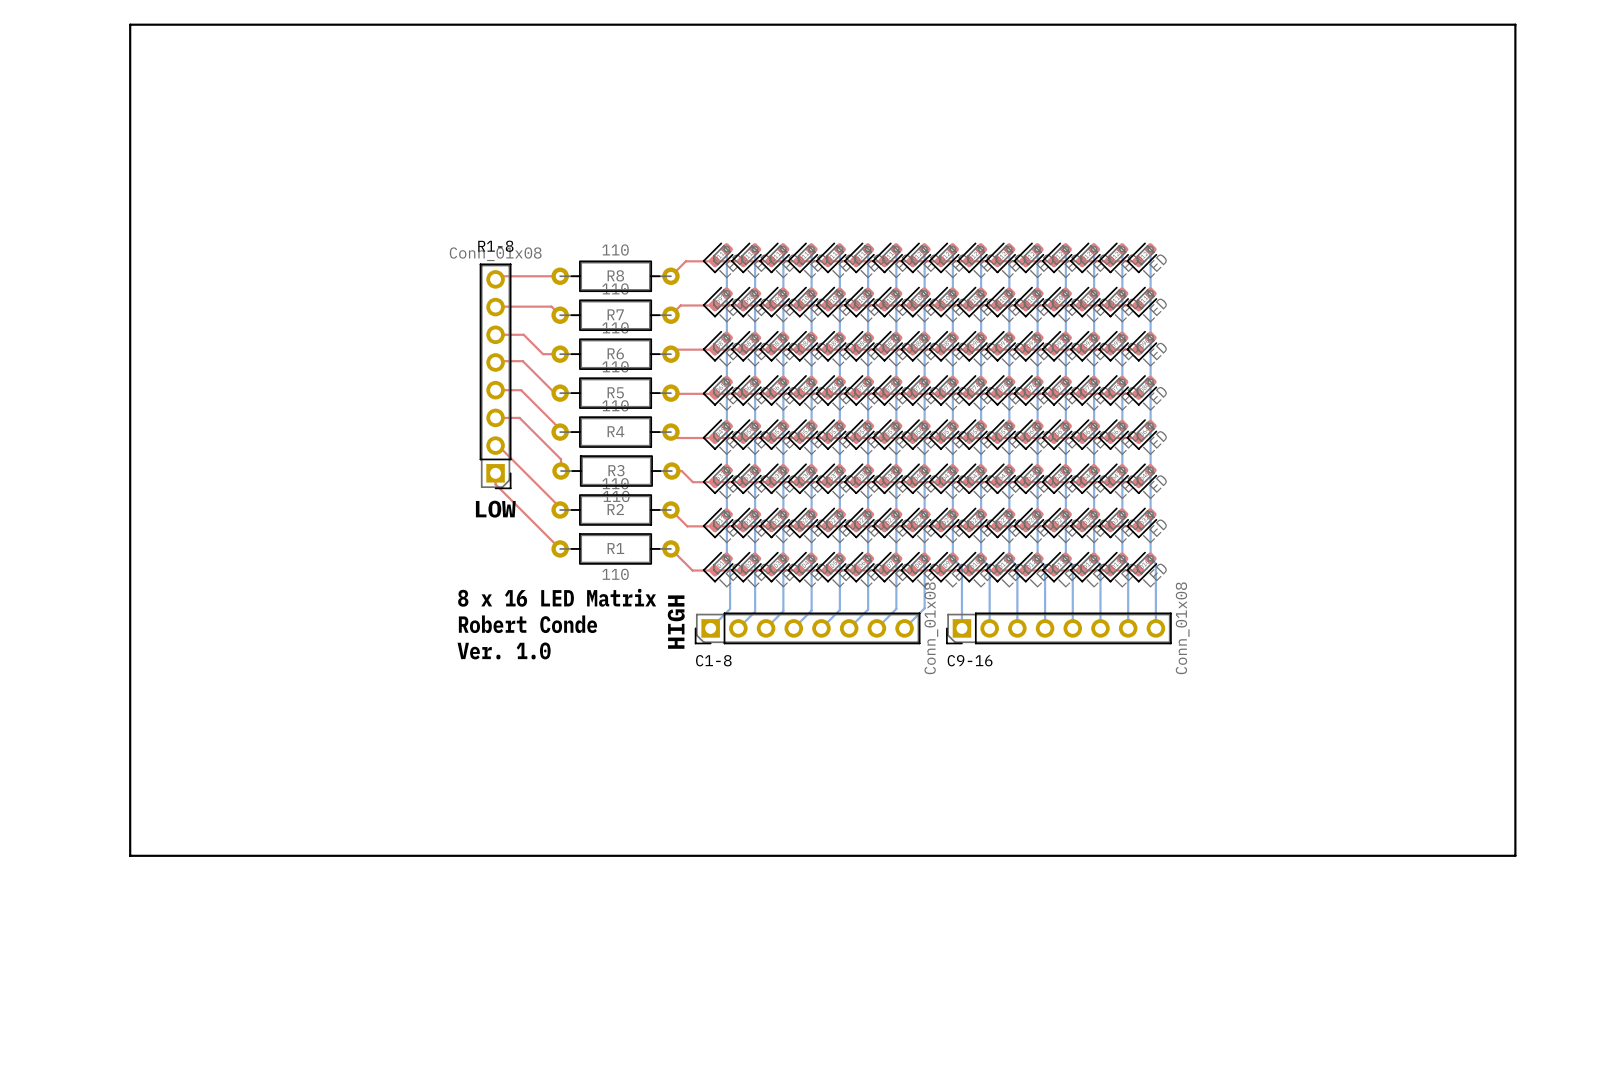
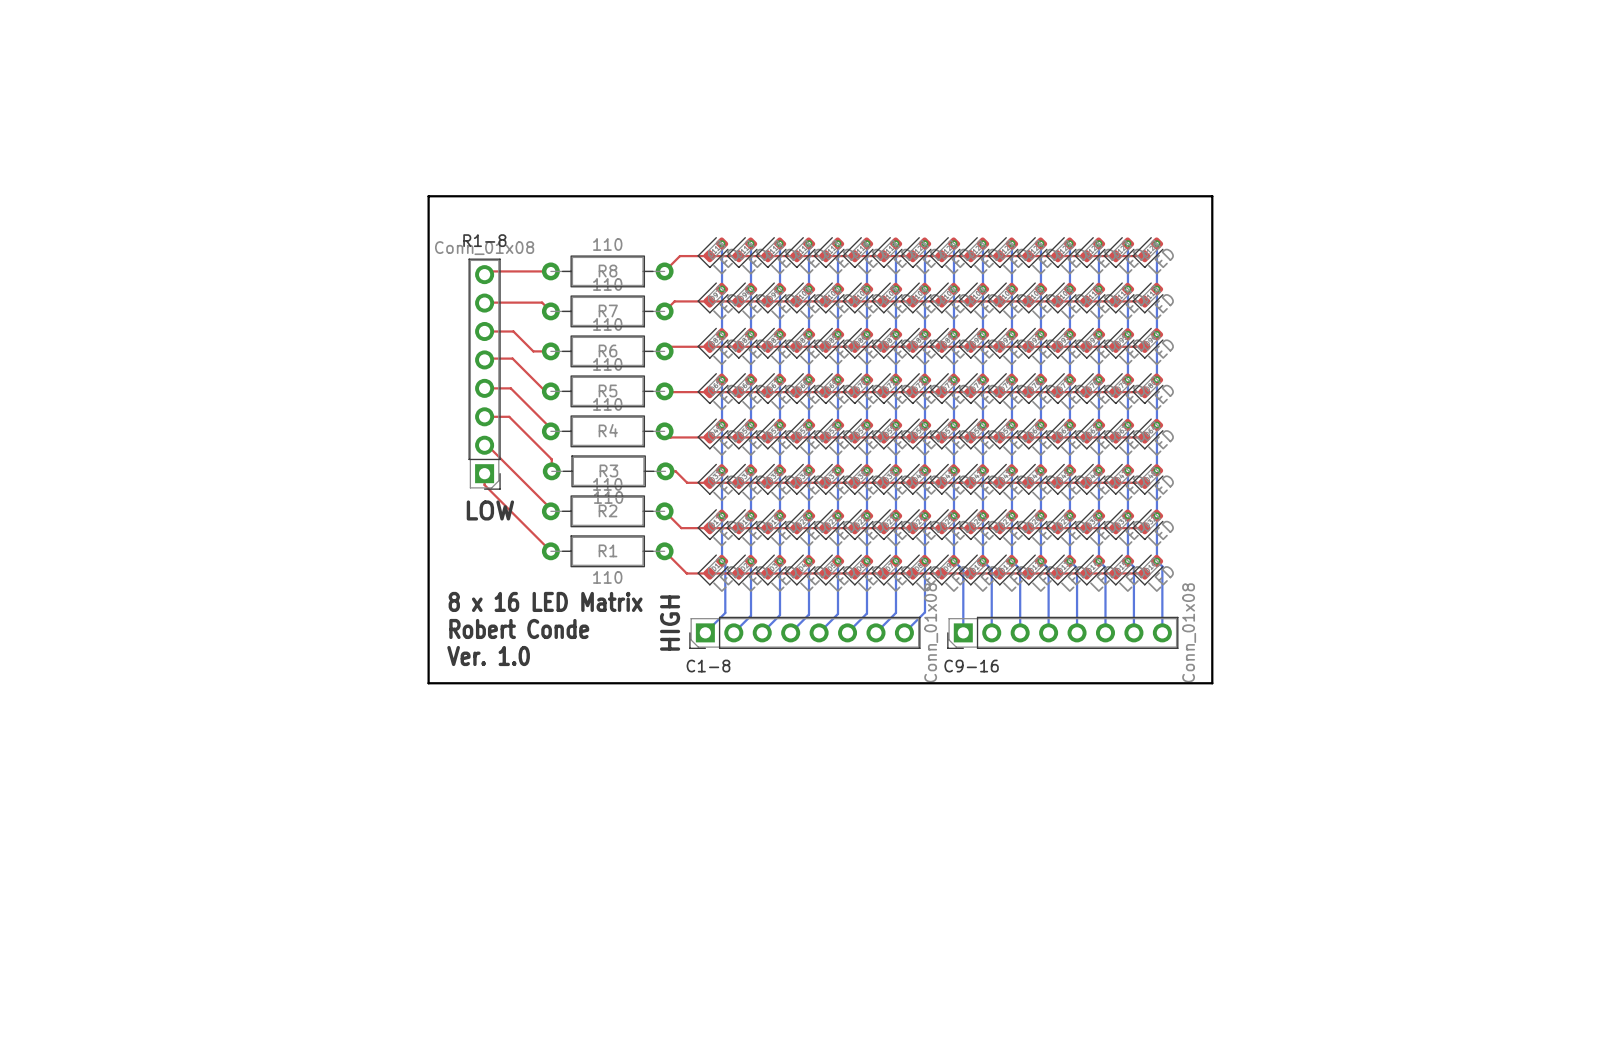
board edge: (130, 24) (1515, 24) (1515, 855) (130, 855) (130, 24) -> none
board edge: none -> (428, 196) (1212, 196) (1212, 683) (428, 683) (428, 196)

